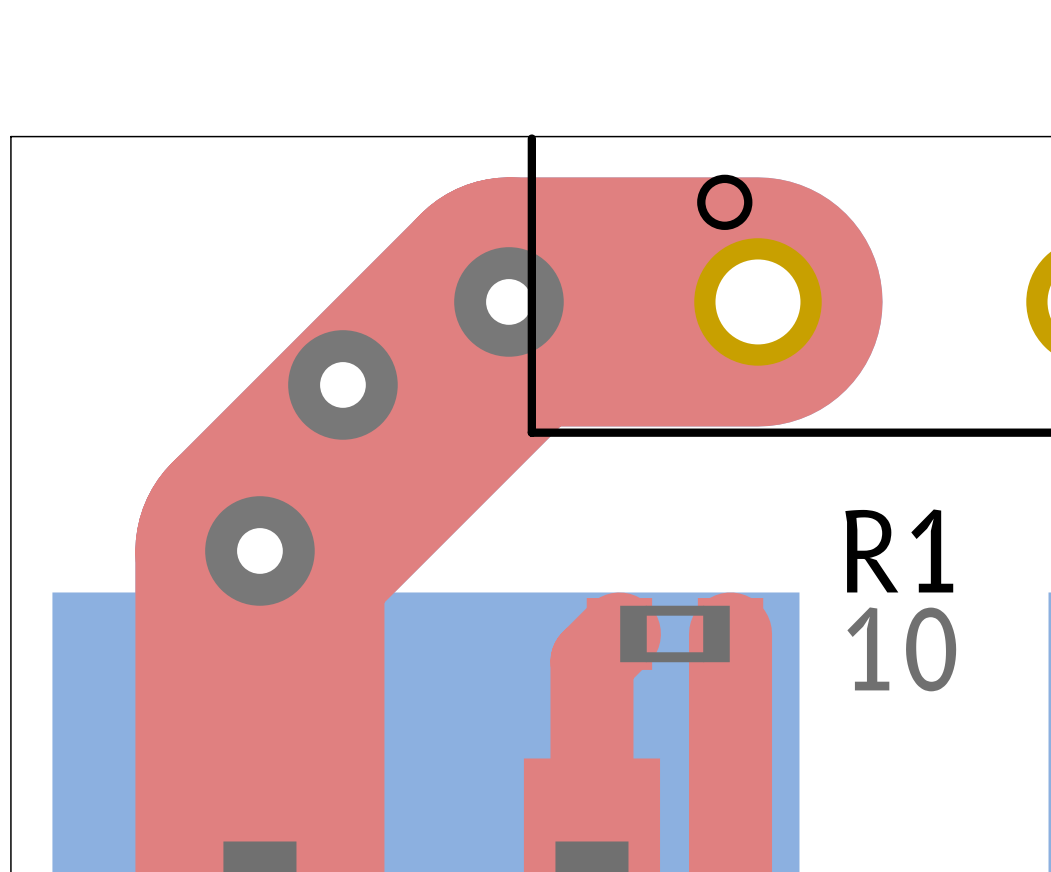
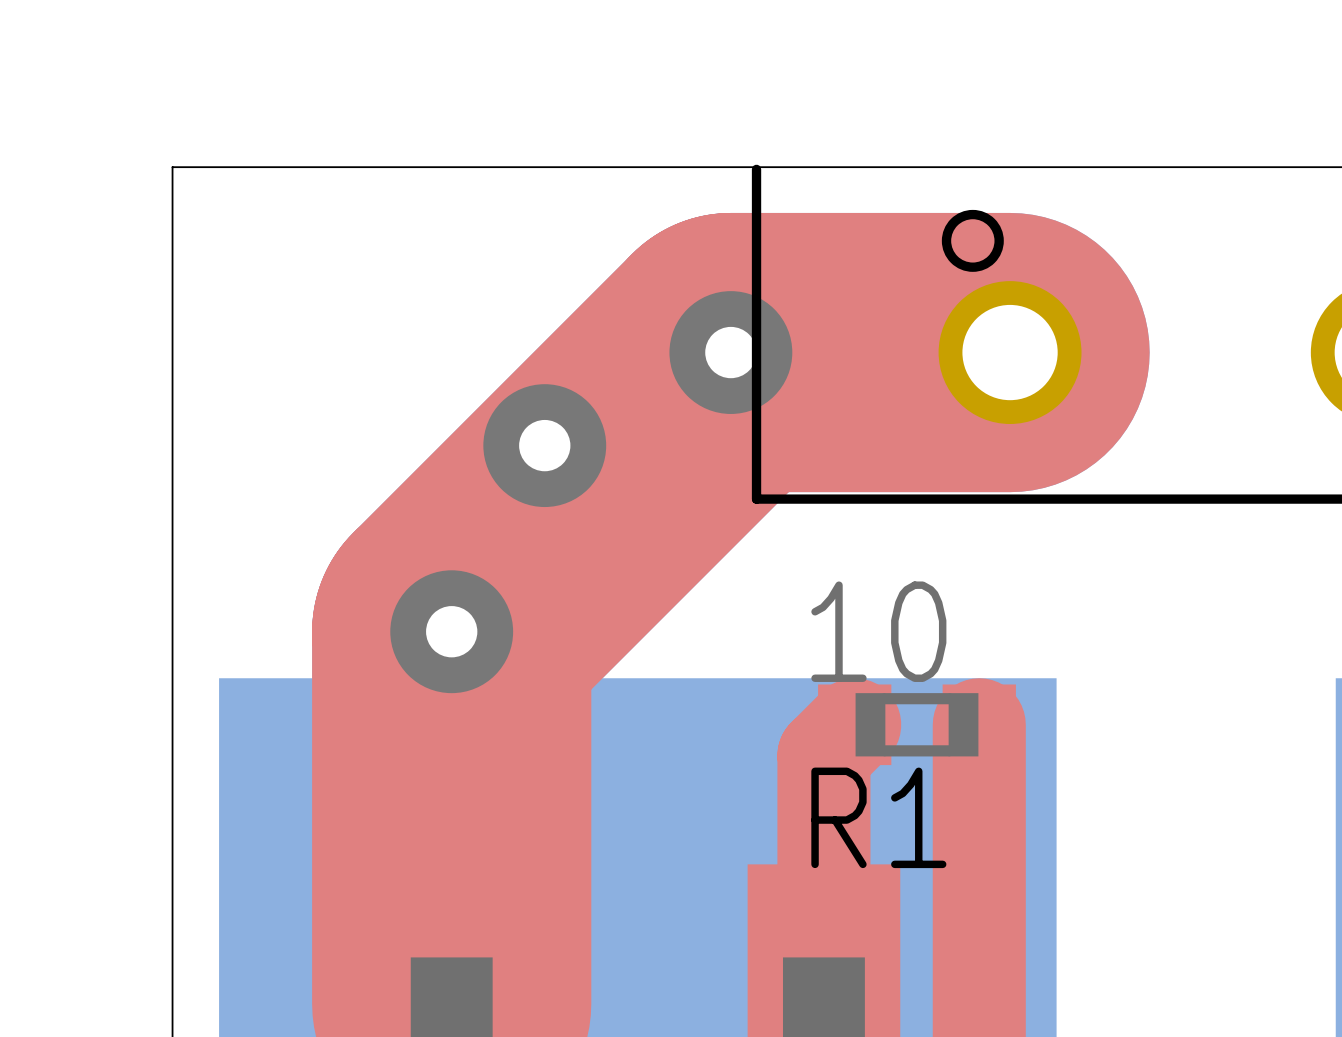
R1 name position: R1 (899, 550) -> R1 (878, 817)
R1 value position: 10 (901, 649) -> 10 (878, 631)

